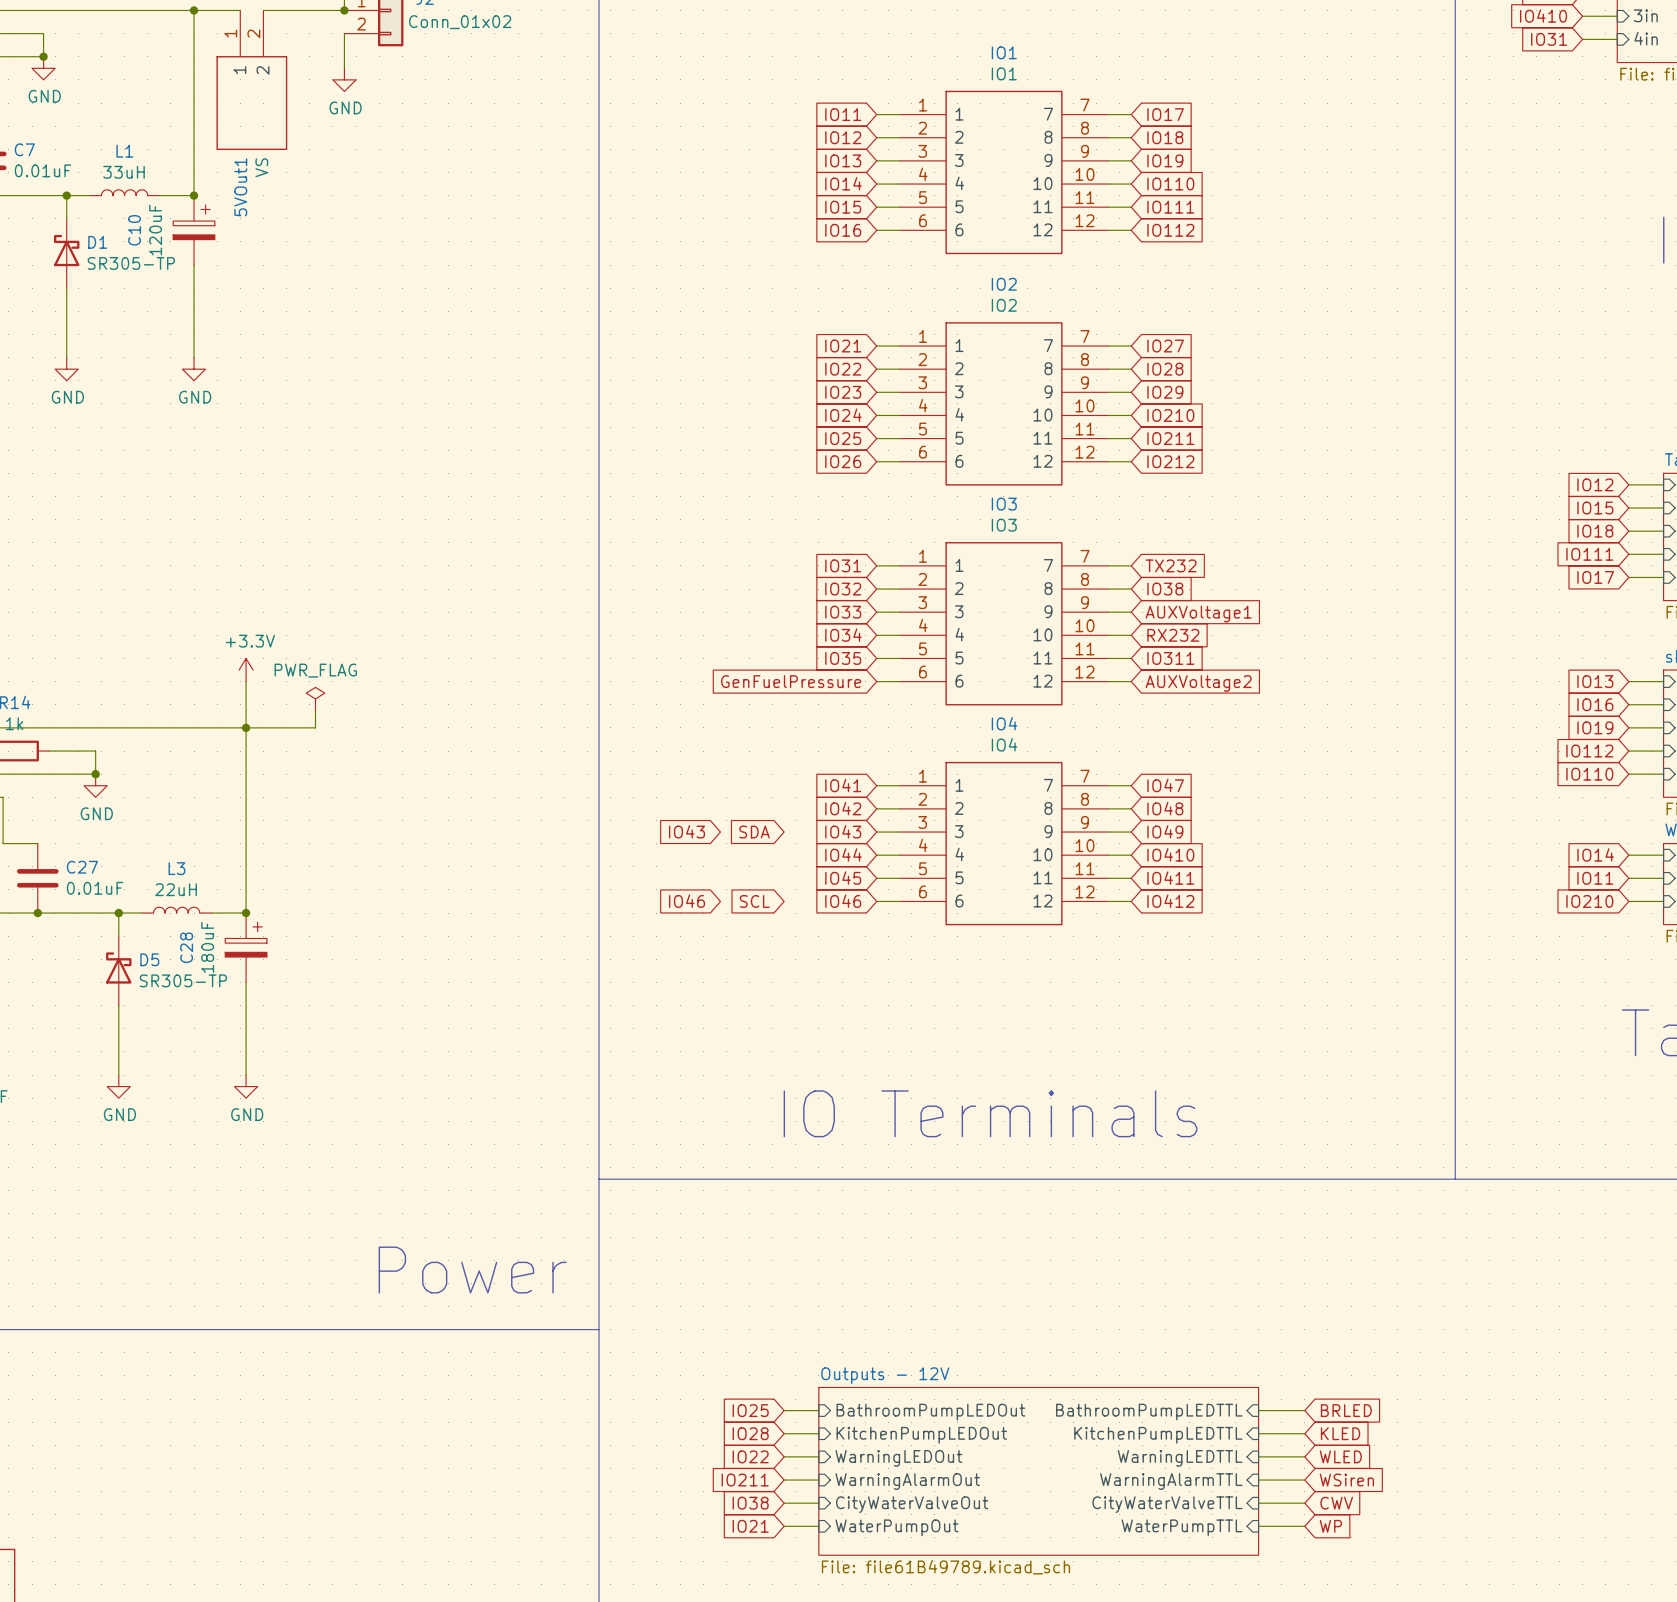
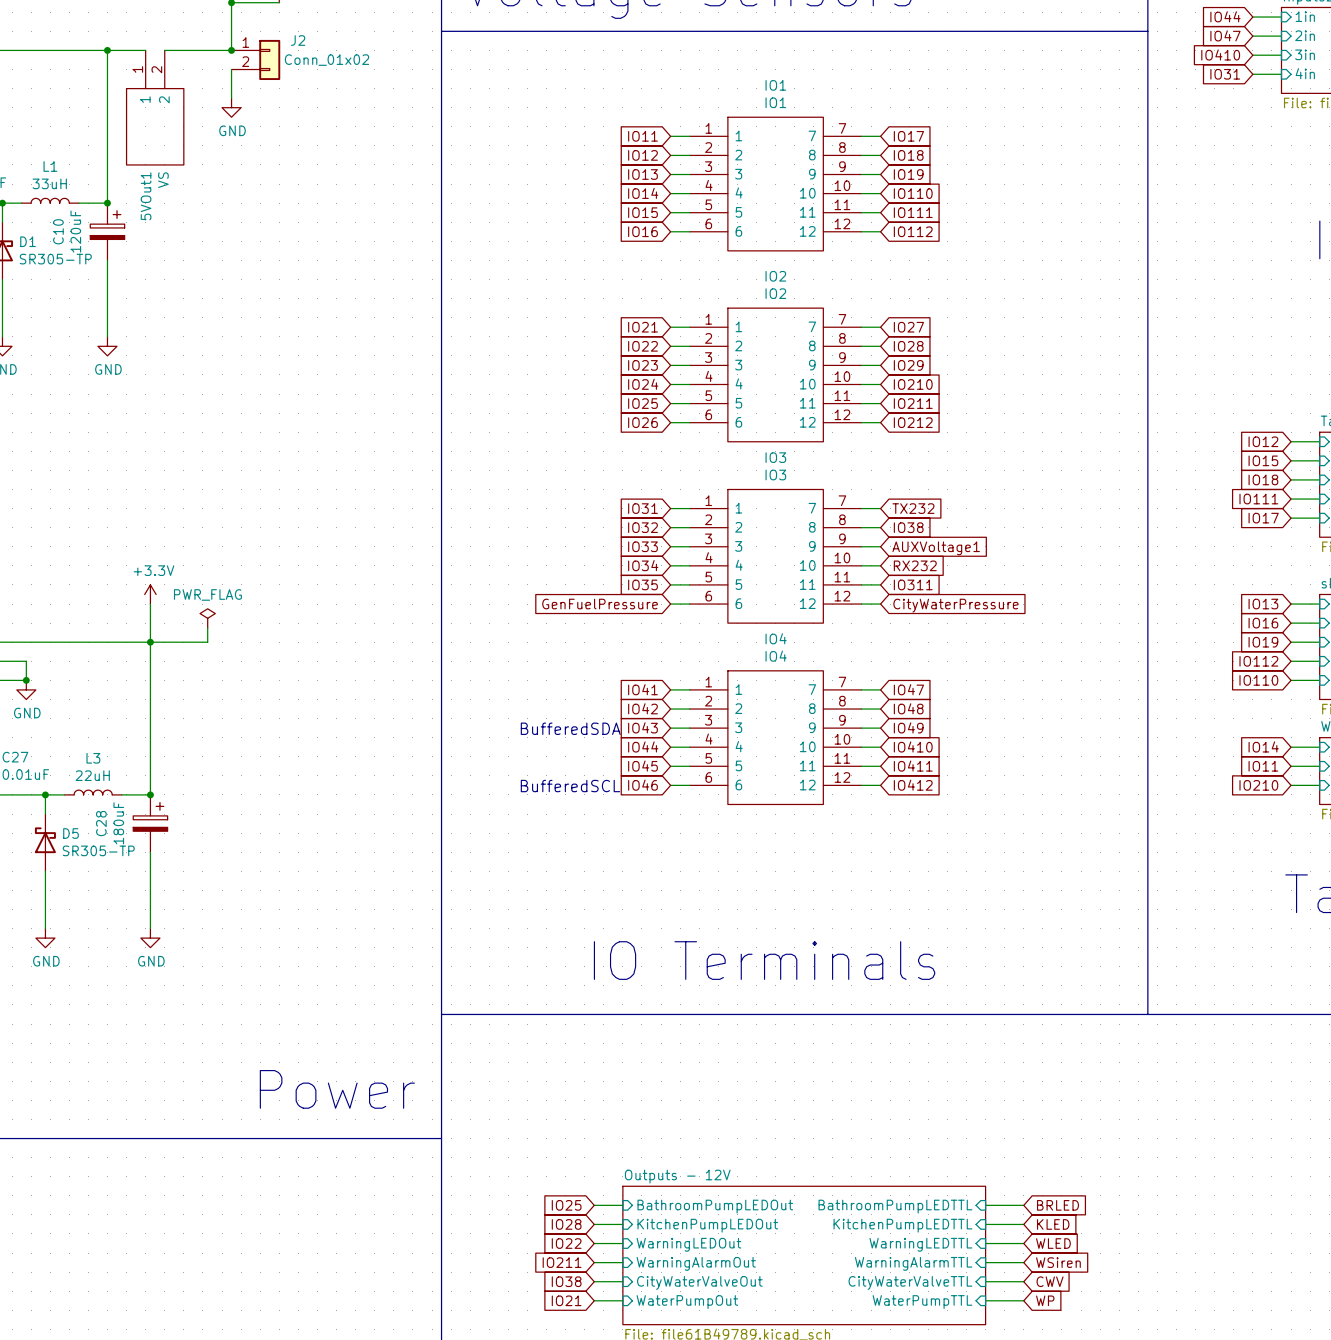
global label: AUXVoltage2 (1198, 683) -> CityWaterPressure (955, 605)
global label: IO43 (687, 831) -> none
global label: SDA (754, 832) -> none
text: none -> BufferedSDA (570, 728)
global label: IO46 (687, 901) -> none
global label: SCL (754, 901) -> none
text: none -> BufferedSCL (570, 786)

